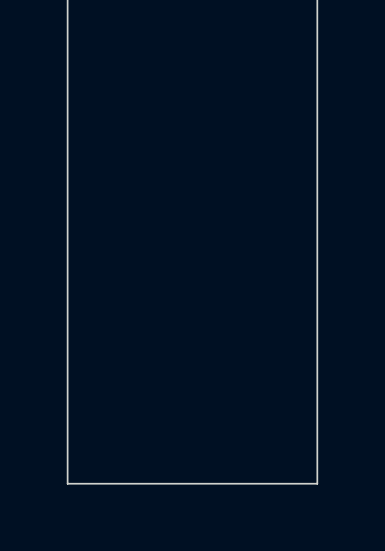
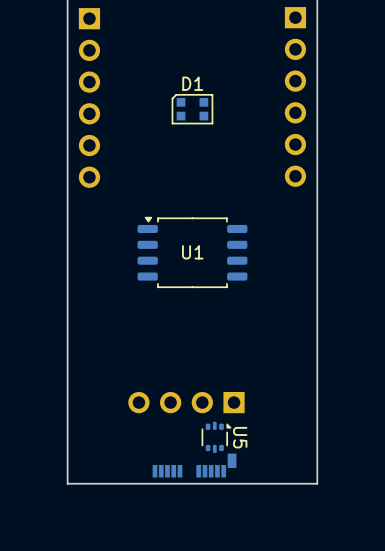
part: none -> (295, 96)
part: none -> (89, 97)
D1: none -> (192, 109)
U1: none -> (192, 252)
part: none -> (186, 402)
U5: none -> (216, 437)
part: none -> (194, 465)

